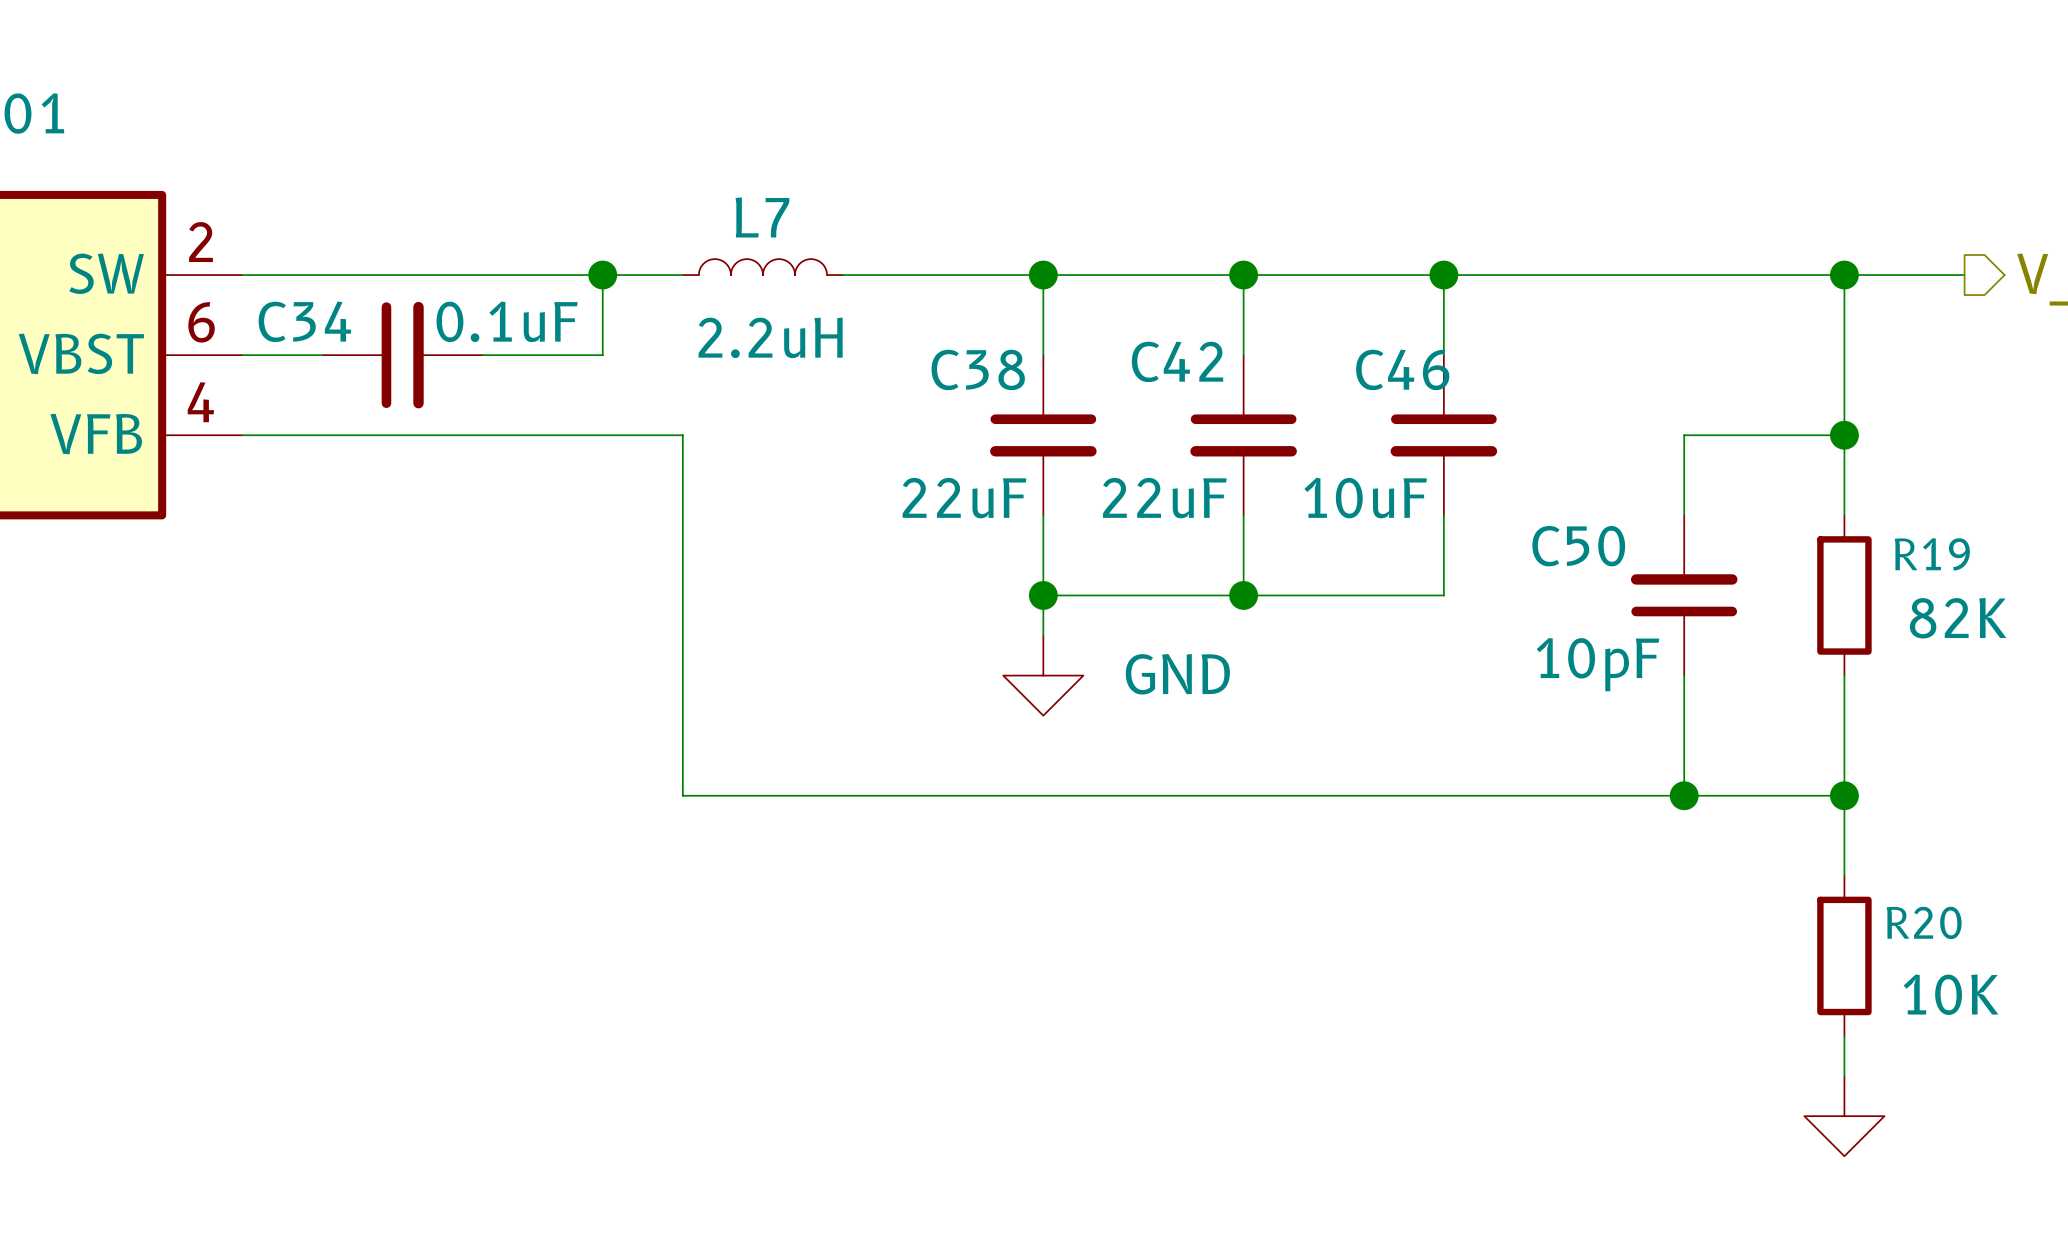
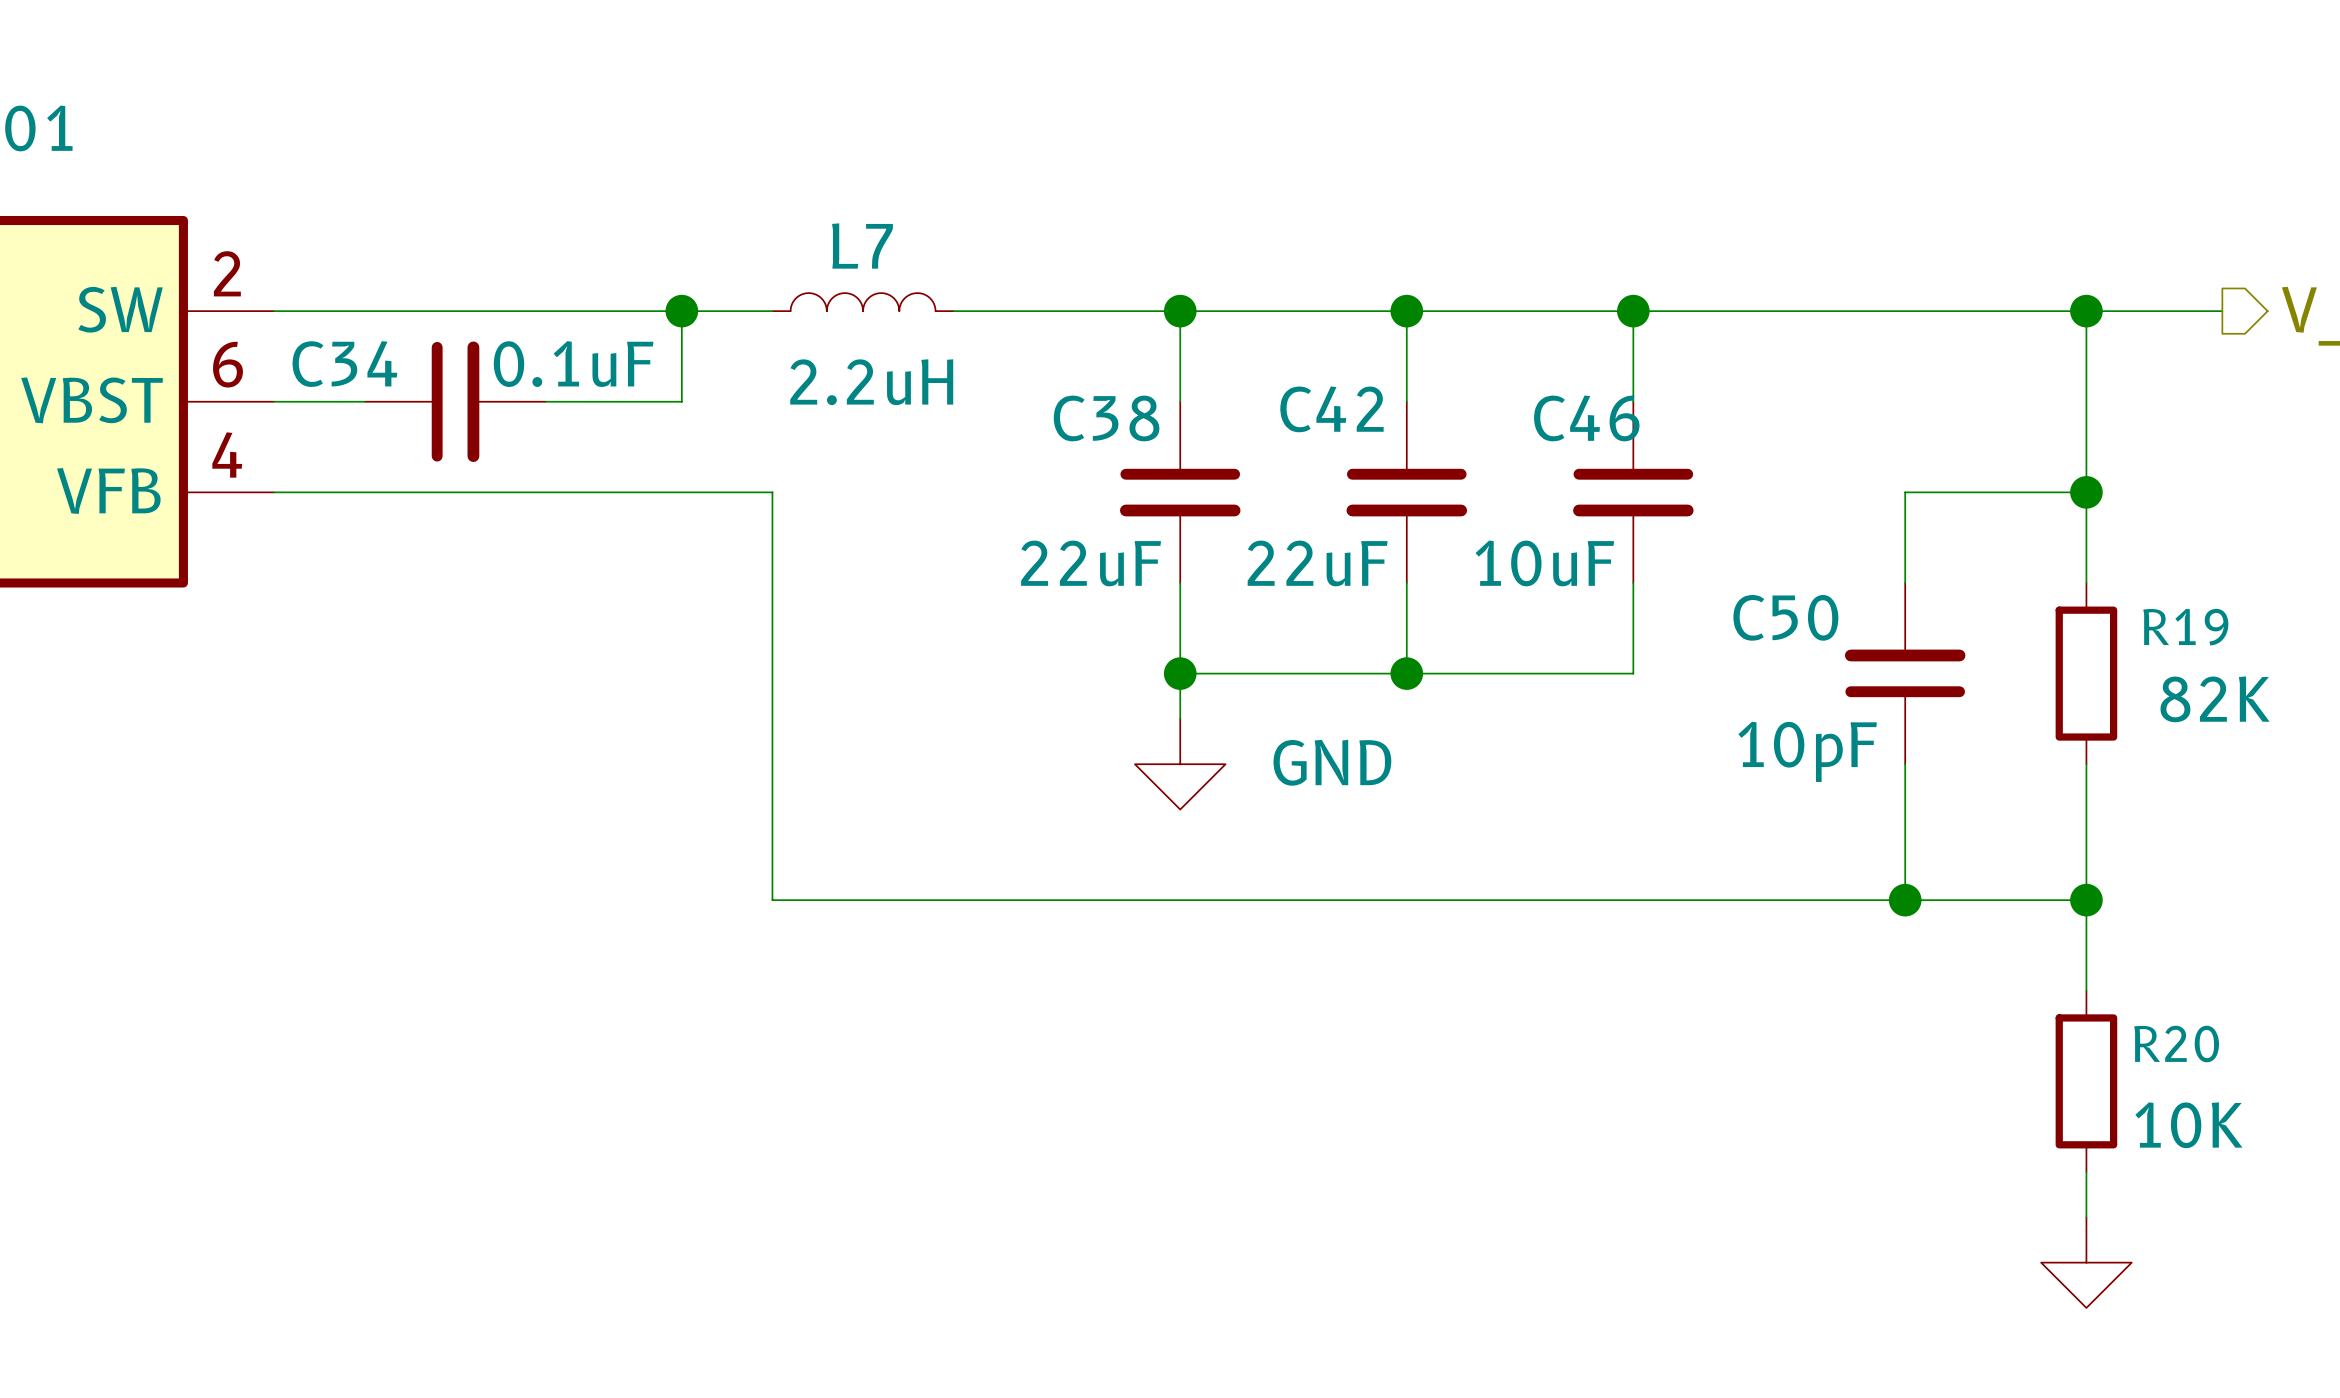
R20 value position: 10K (1951, 994) -> 10K (2188, 1125)

